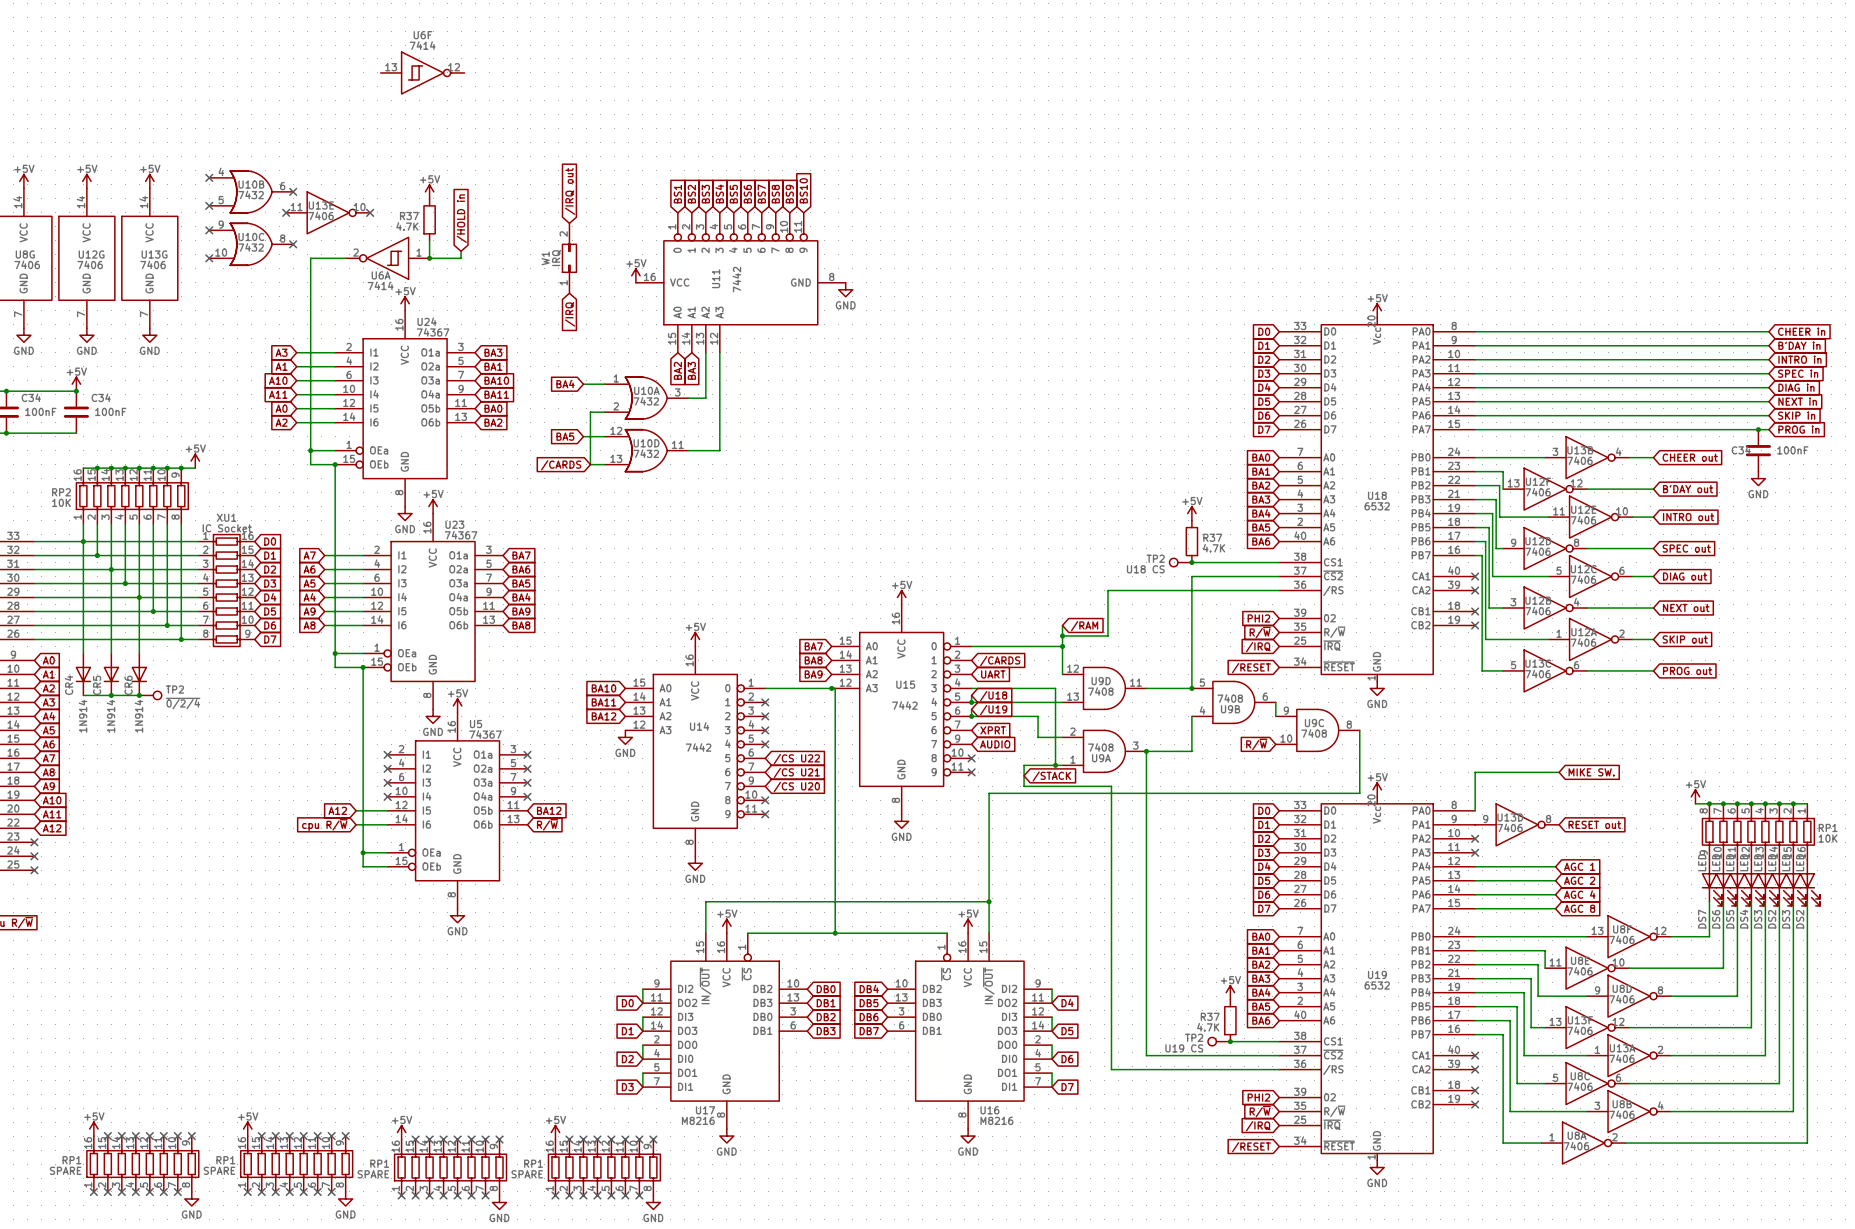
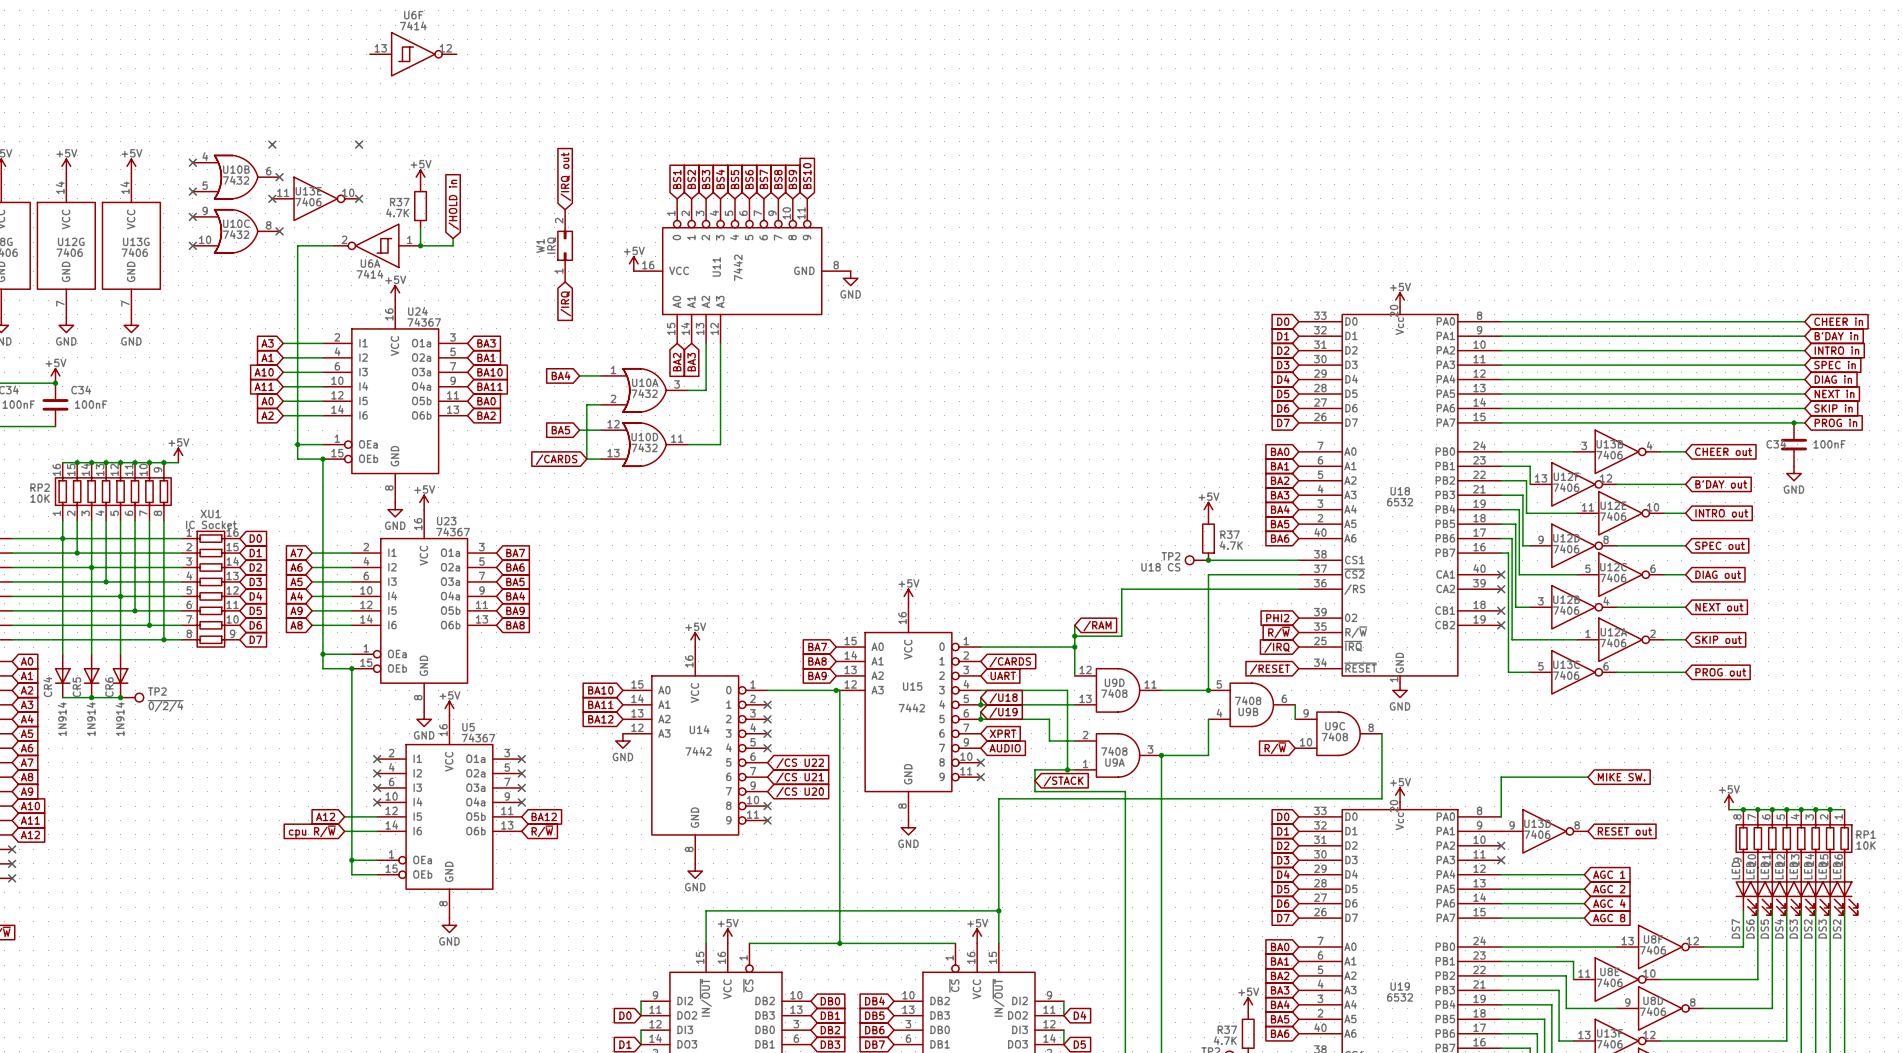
no-connect mark: none -> (272, 144)
no-connect mark: none -> (359, 144)

